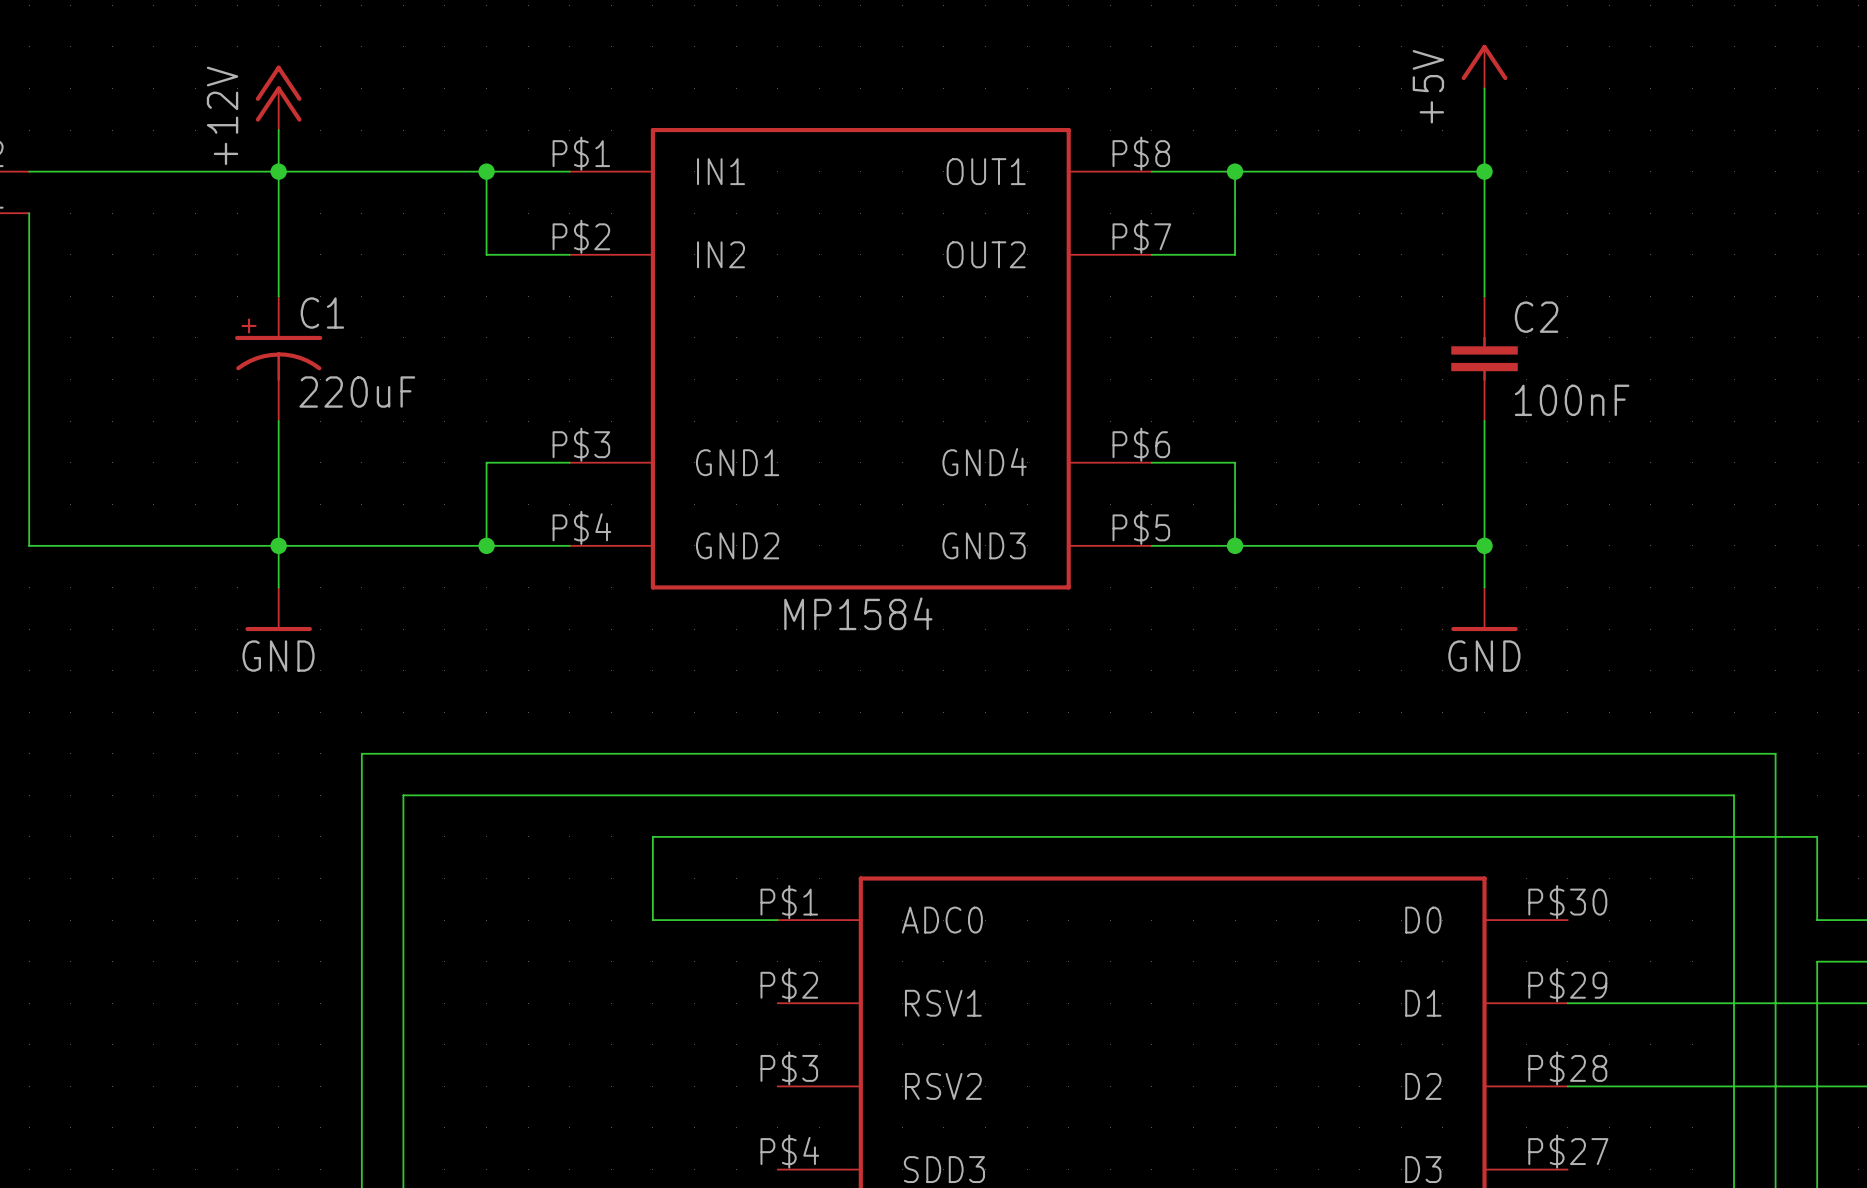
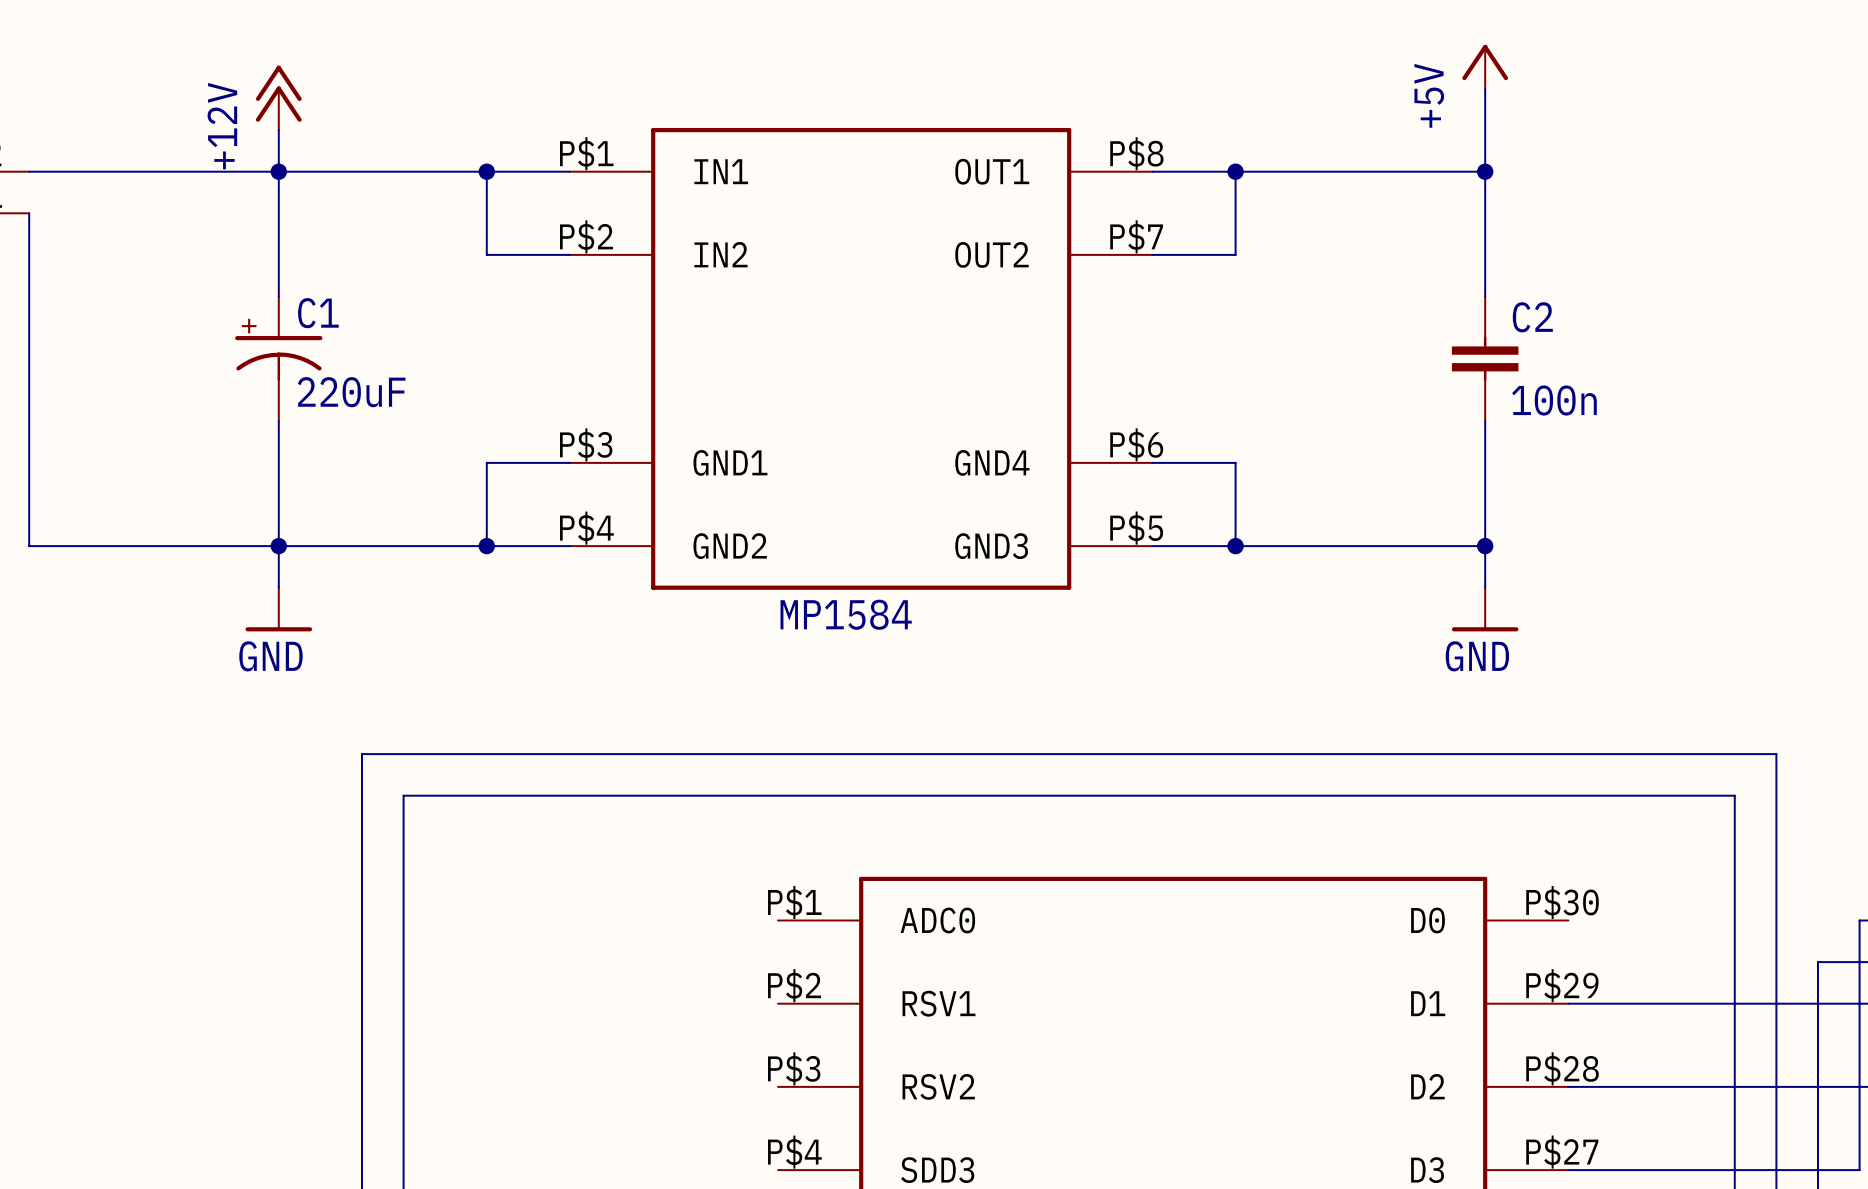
C2 value: 100nF (1572, 400) -> 100n (1554, 400)
wire: (777, 920) (652, 920) (652, 836) (1817, 836) (1817, 920) (1858, 920) -> (1568, 1170) (1859, 1170) (1859, 920)

